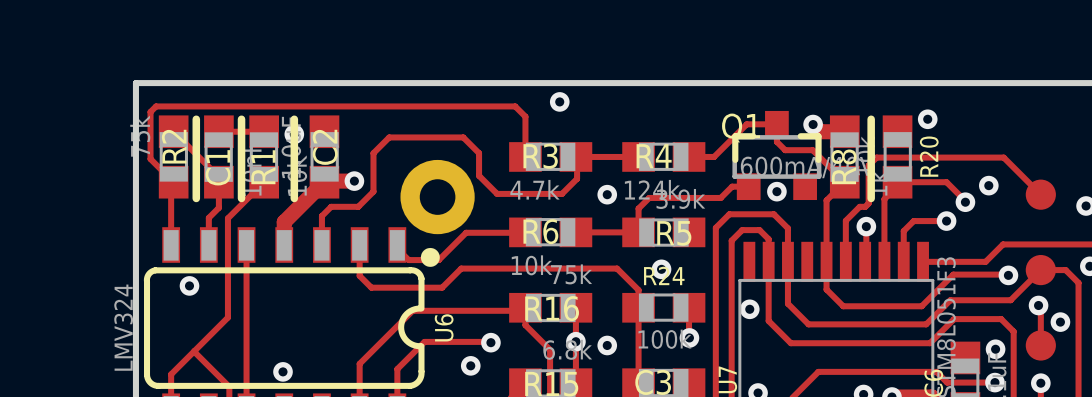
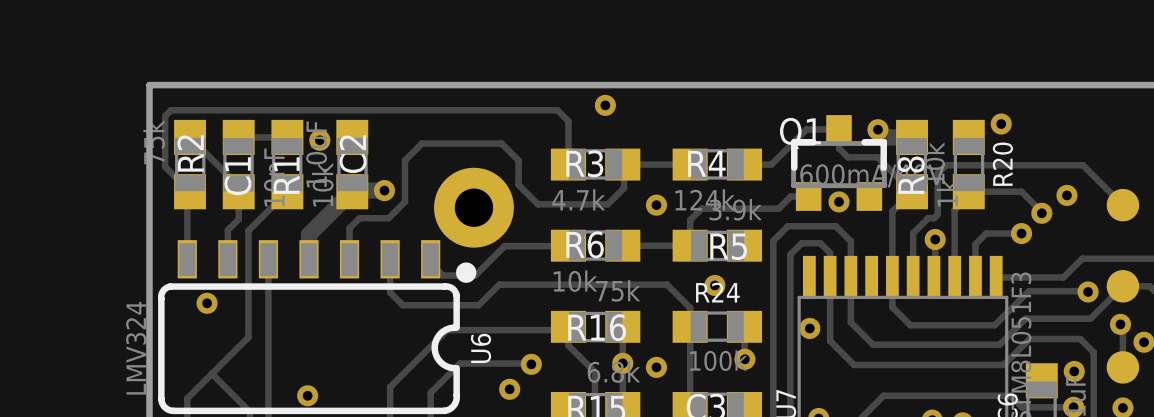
line: (196, 119) (196, 198) -> none
line: (241, 119) (241, 198) -> none
line: (294, 119) (294, 198) -> none
line: (871, 119) (871, 198) -> none

